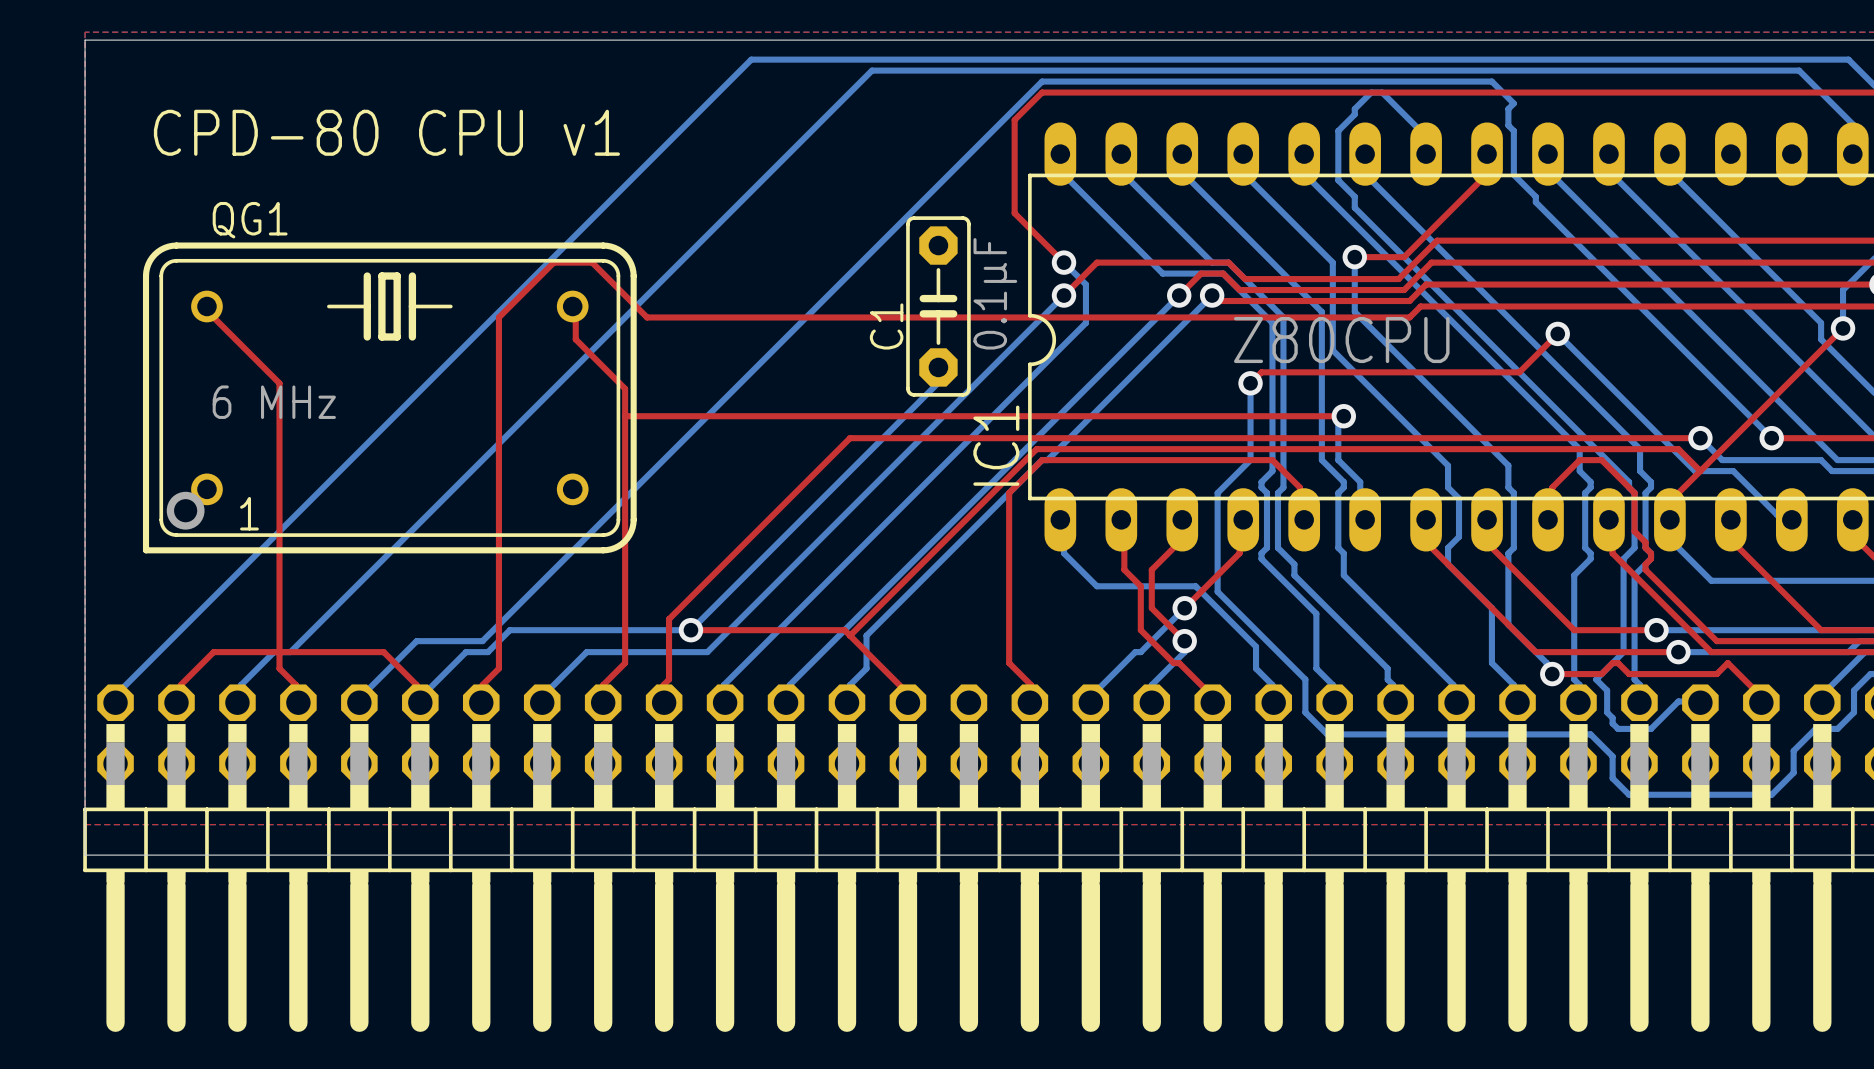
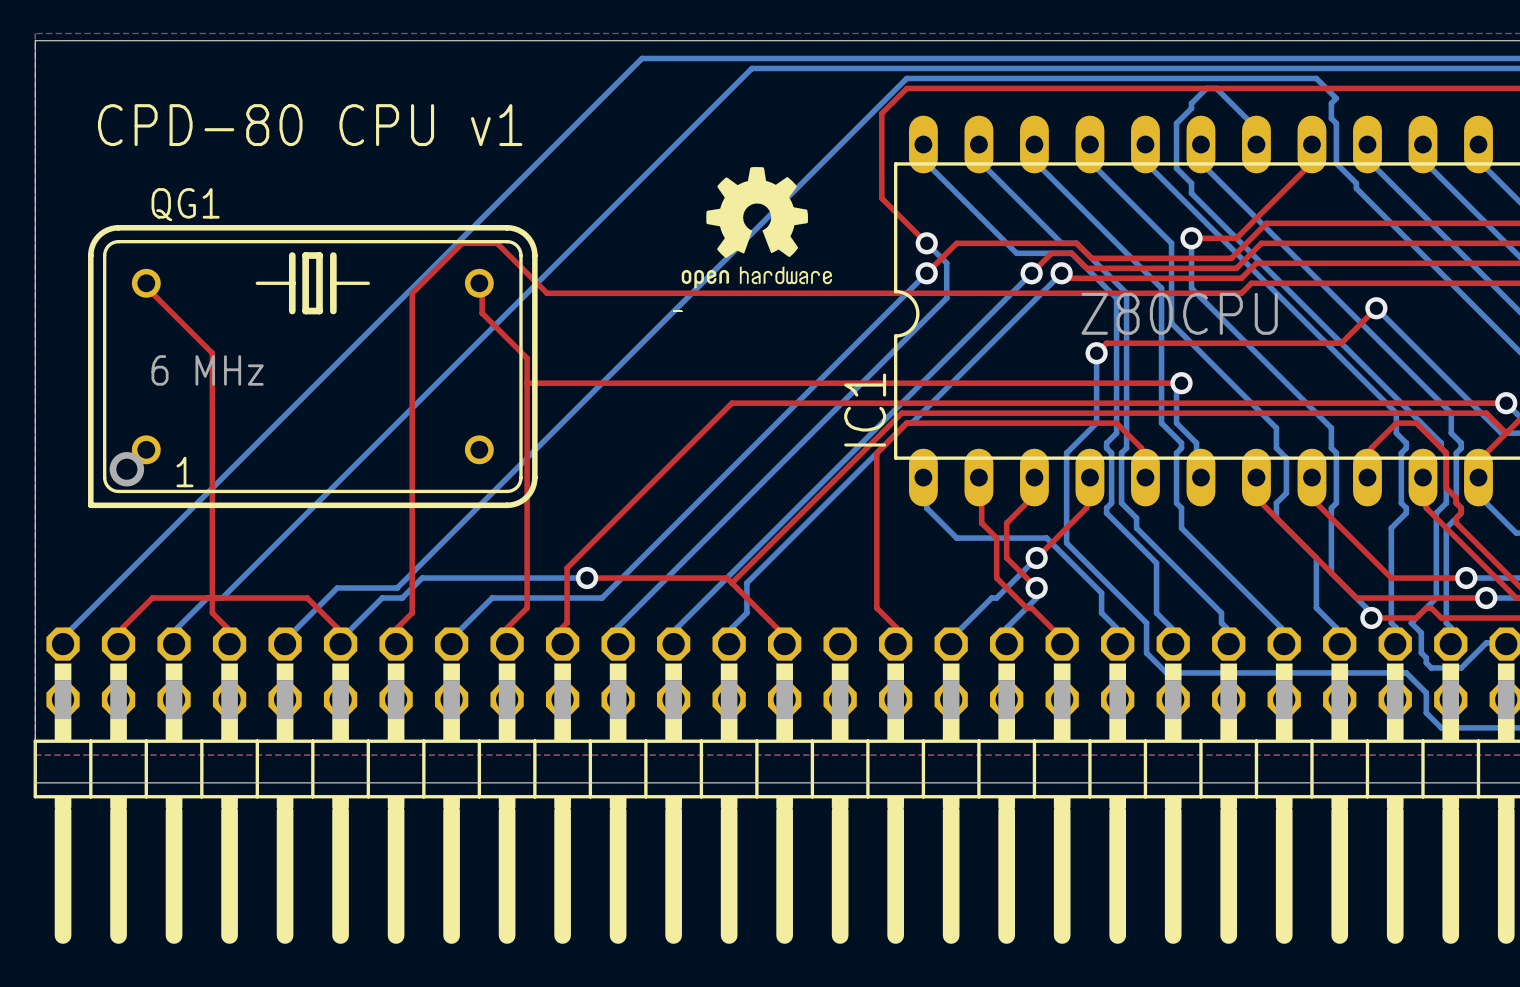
drawing: none -> [681, 167, 832, 289]
C1: 0.1µF (938, 306) -> none
bottom track: (938, 367) (937, 383) (690, 630) -> none

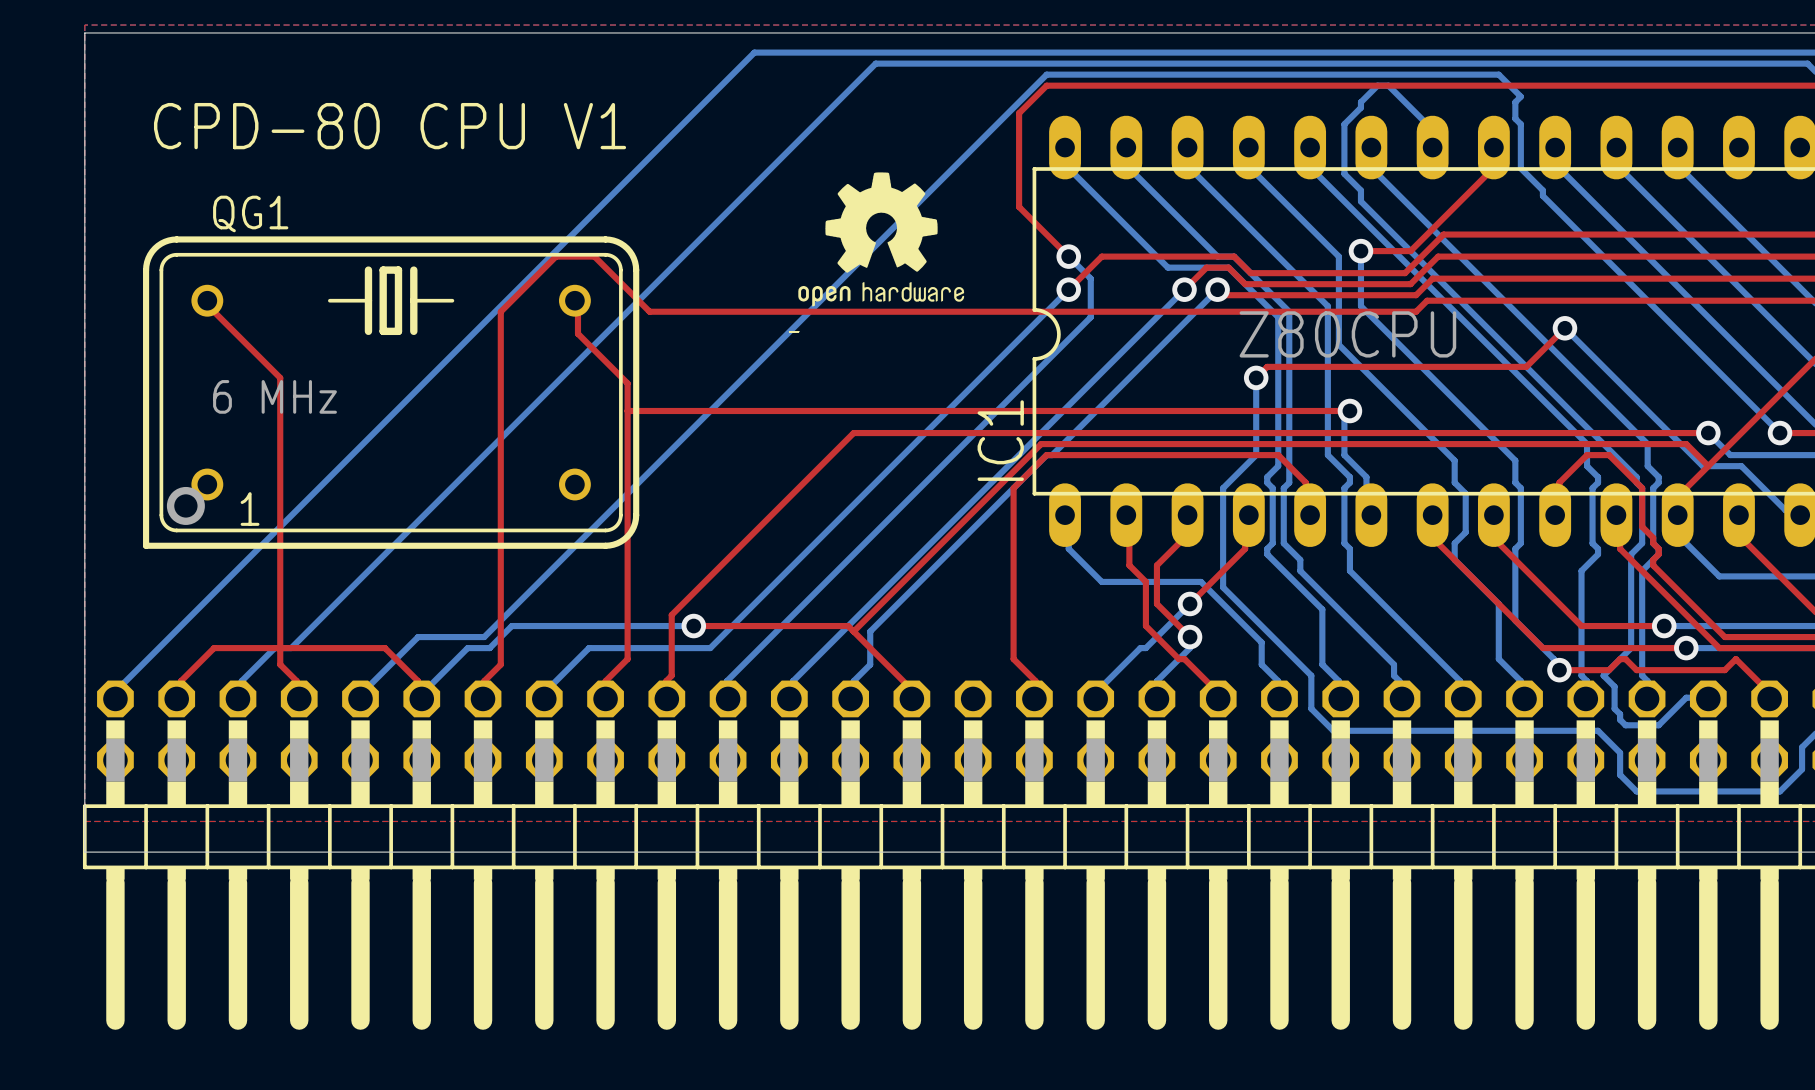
text: CPD-80 CPU v1 (310, 125) -> CPD-80 CPU V1 (390, 126)

